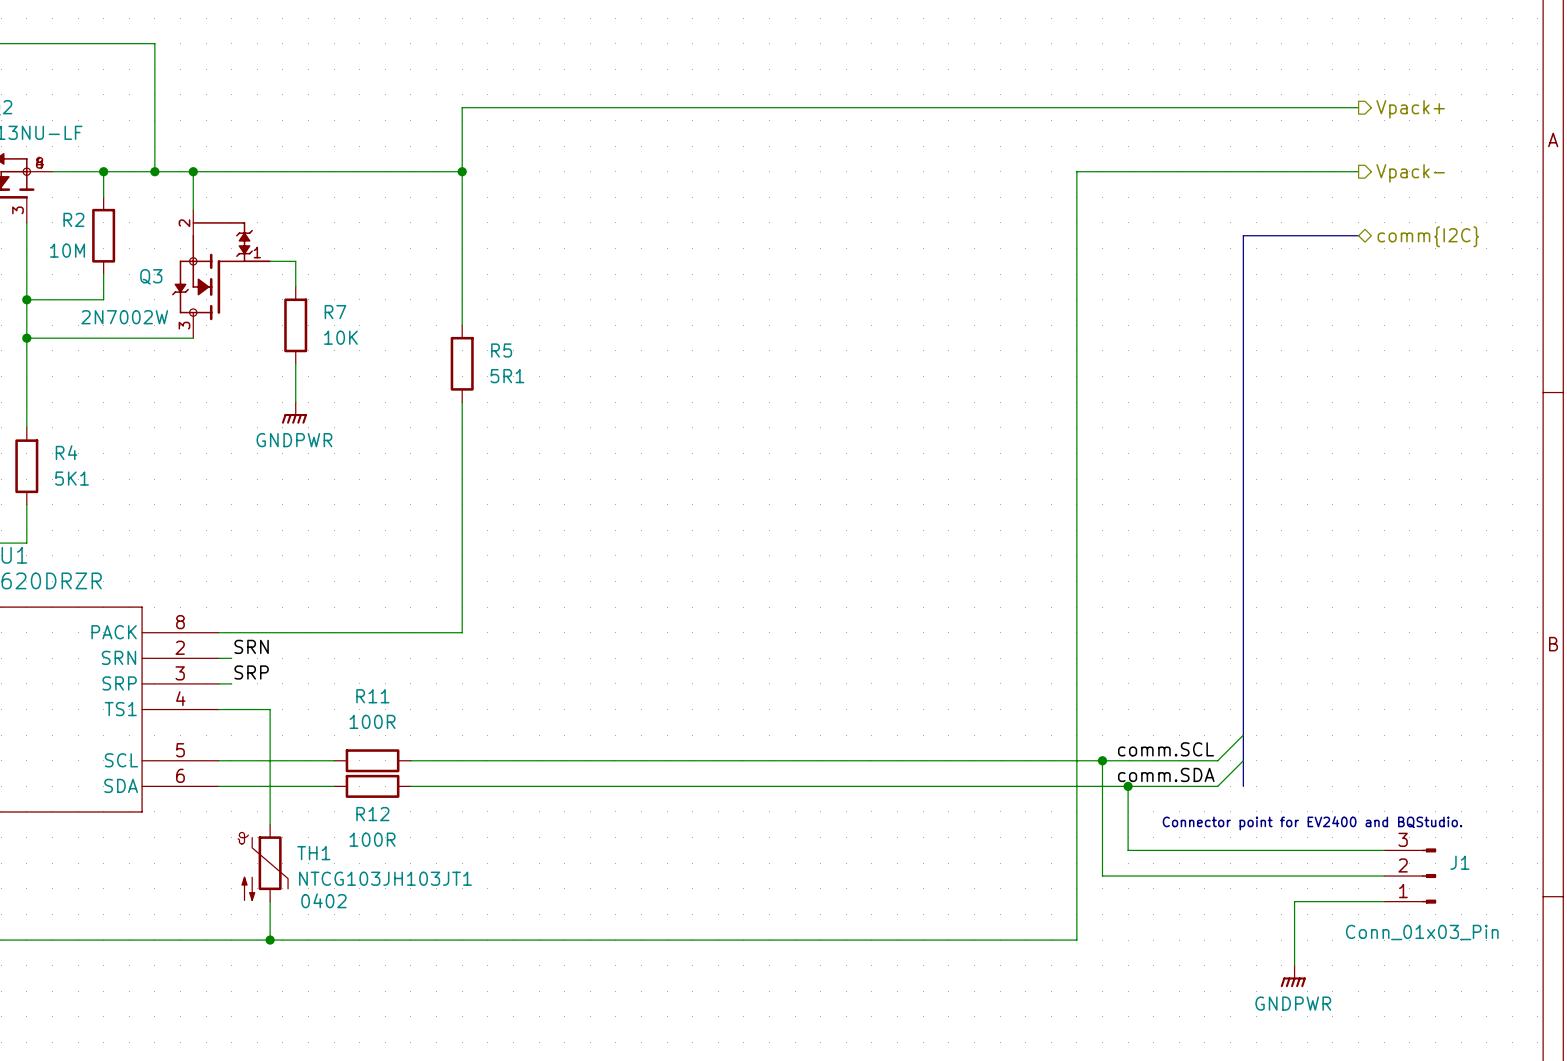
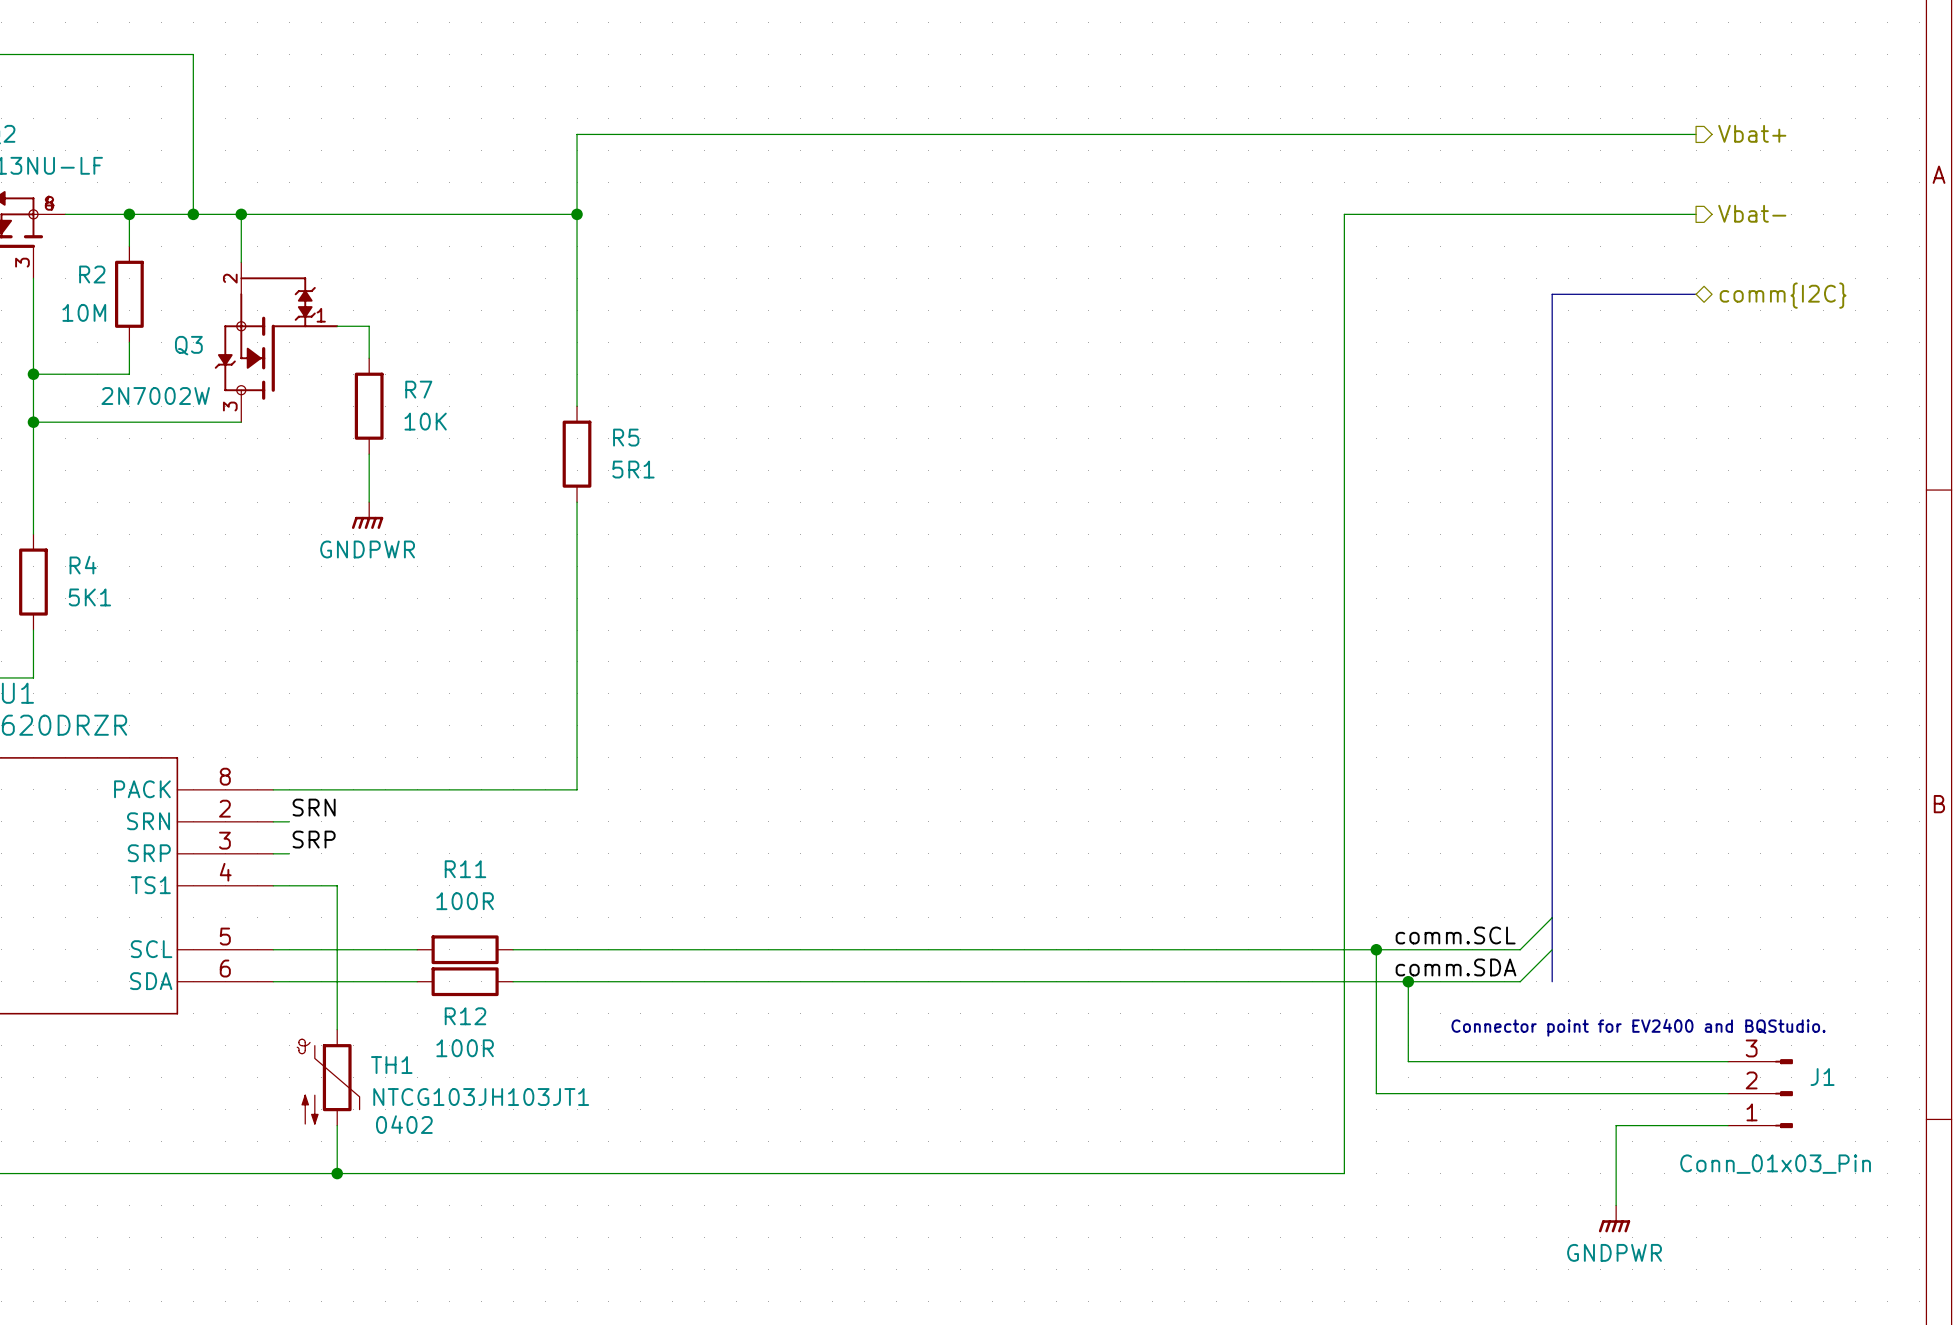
hierarchical label: Vpack+ (1410, 109) -> Vbat+ (1752, 133)
hierarchical label: Vpack- (1410, 173) -> Vbat- (1752, 213)

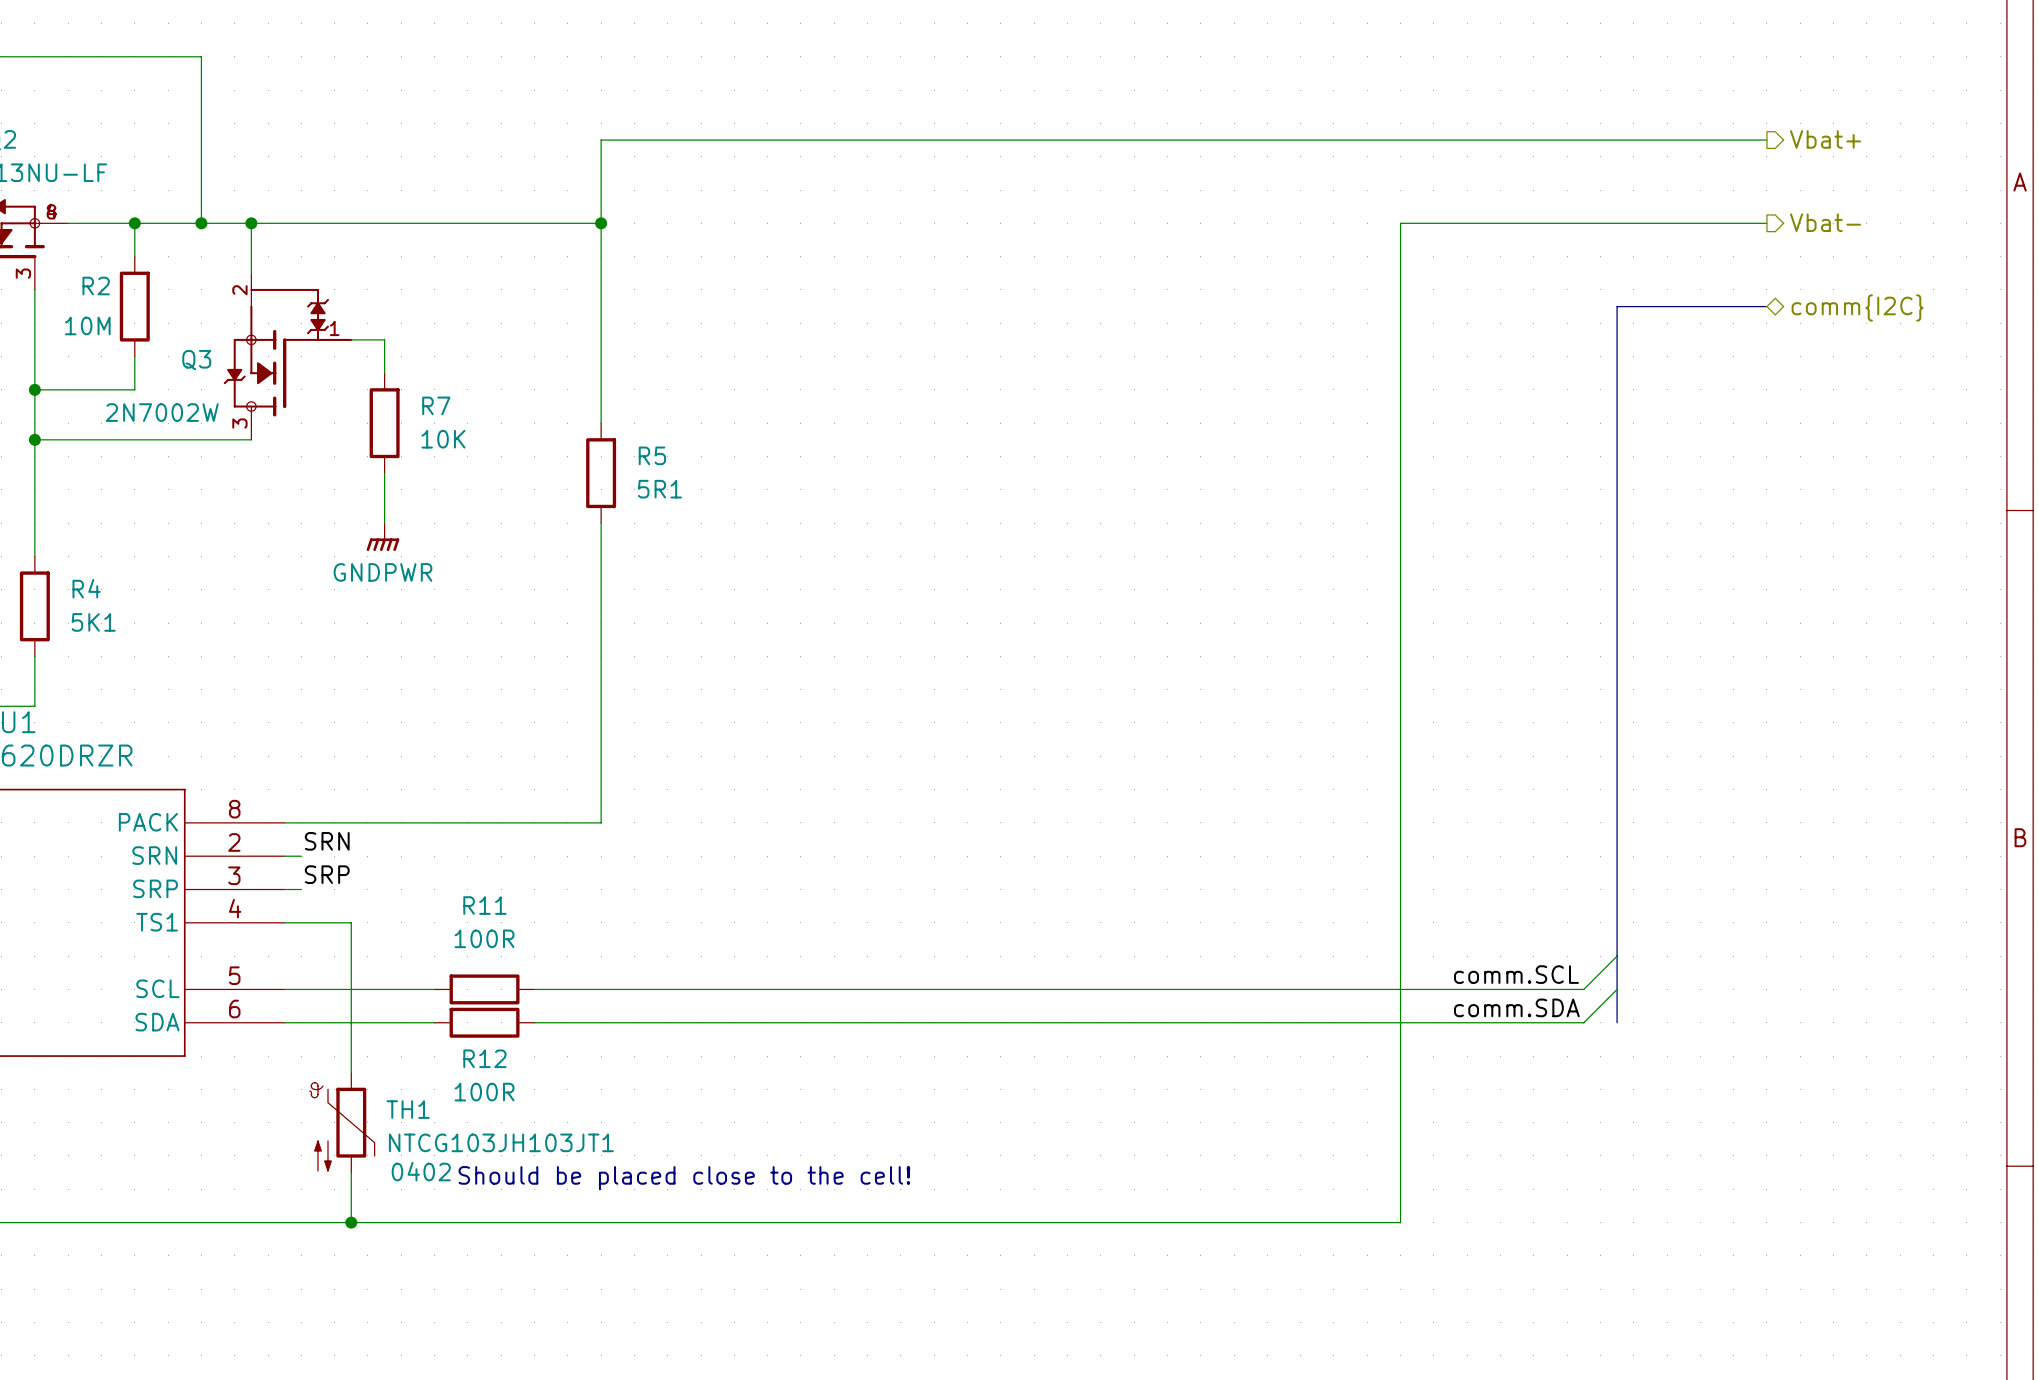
wire: (1376, 949) (1376, 1093) (1728, 1093) -> none
junction: (1376, 949) -> none
wire: (1408, 981) (1408, 1061) (1728, 1061) -> none
junction: (1408, 981) -> none
text: Connector point for EV2400 and BQStudio. (1638, 1027) -> none
J1: Conn_01x03_Pin (1760, 1093) -> none
wire: (1728, 1125) (1616, 1125) (1616, 1205) -> none
text: none -> Should be placed close to the cell! (684, 1178)
power symbol: GNDPWR (1614, 1218) -> none

